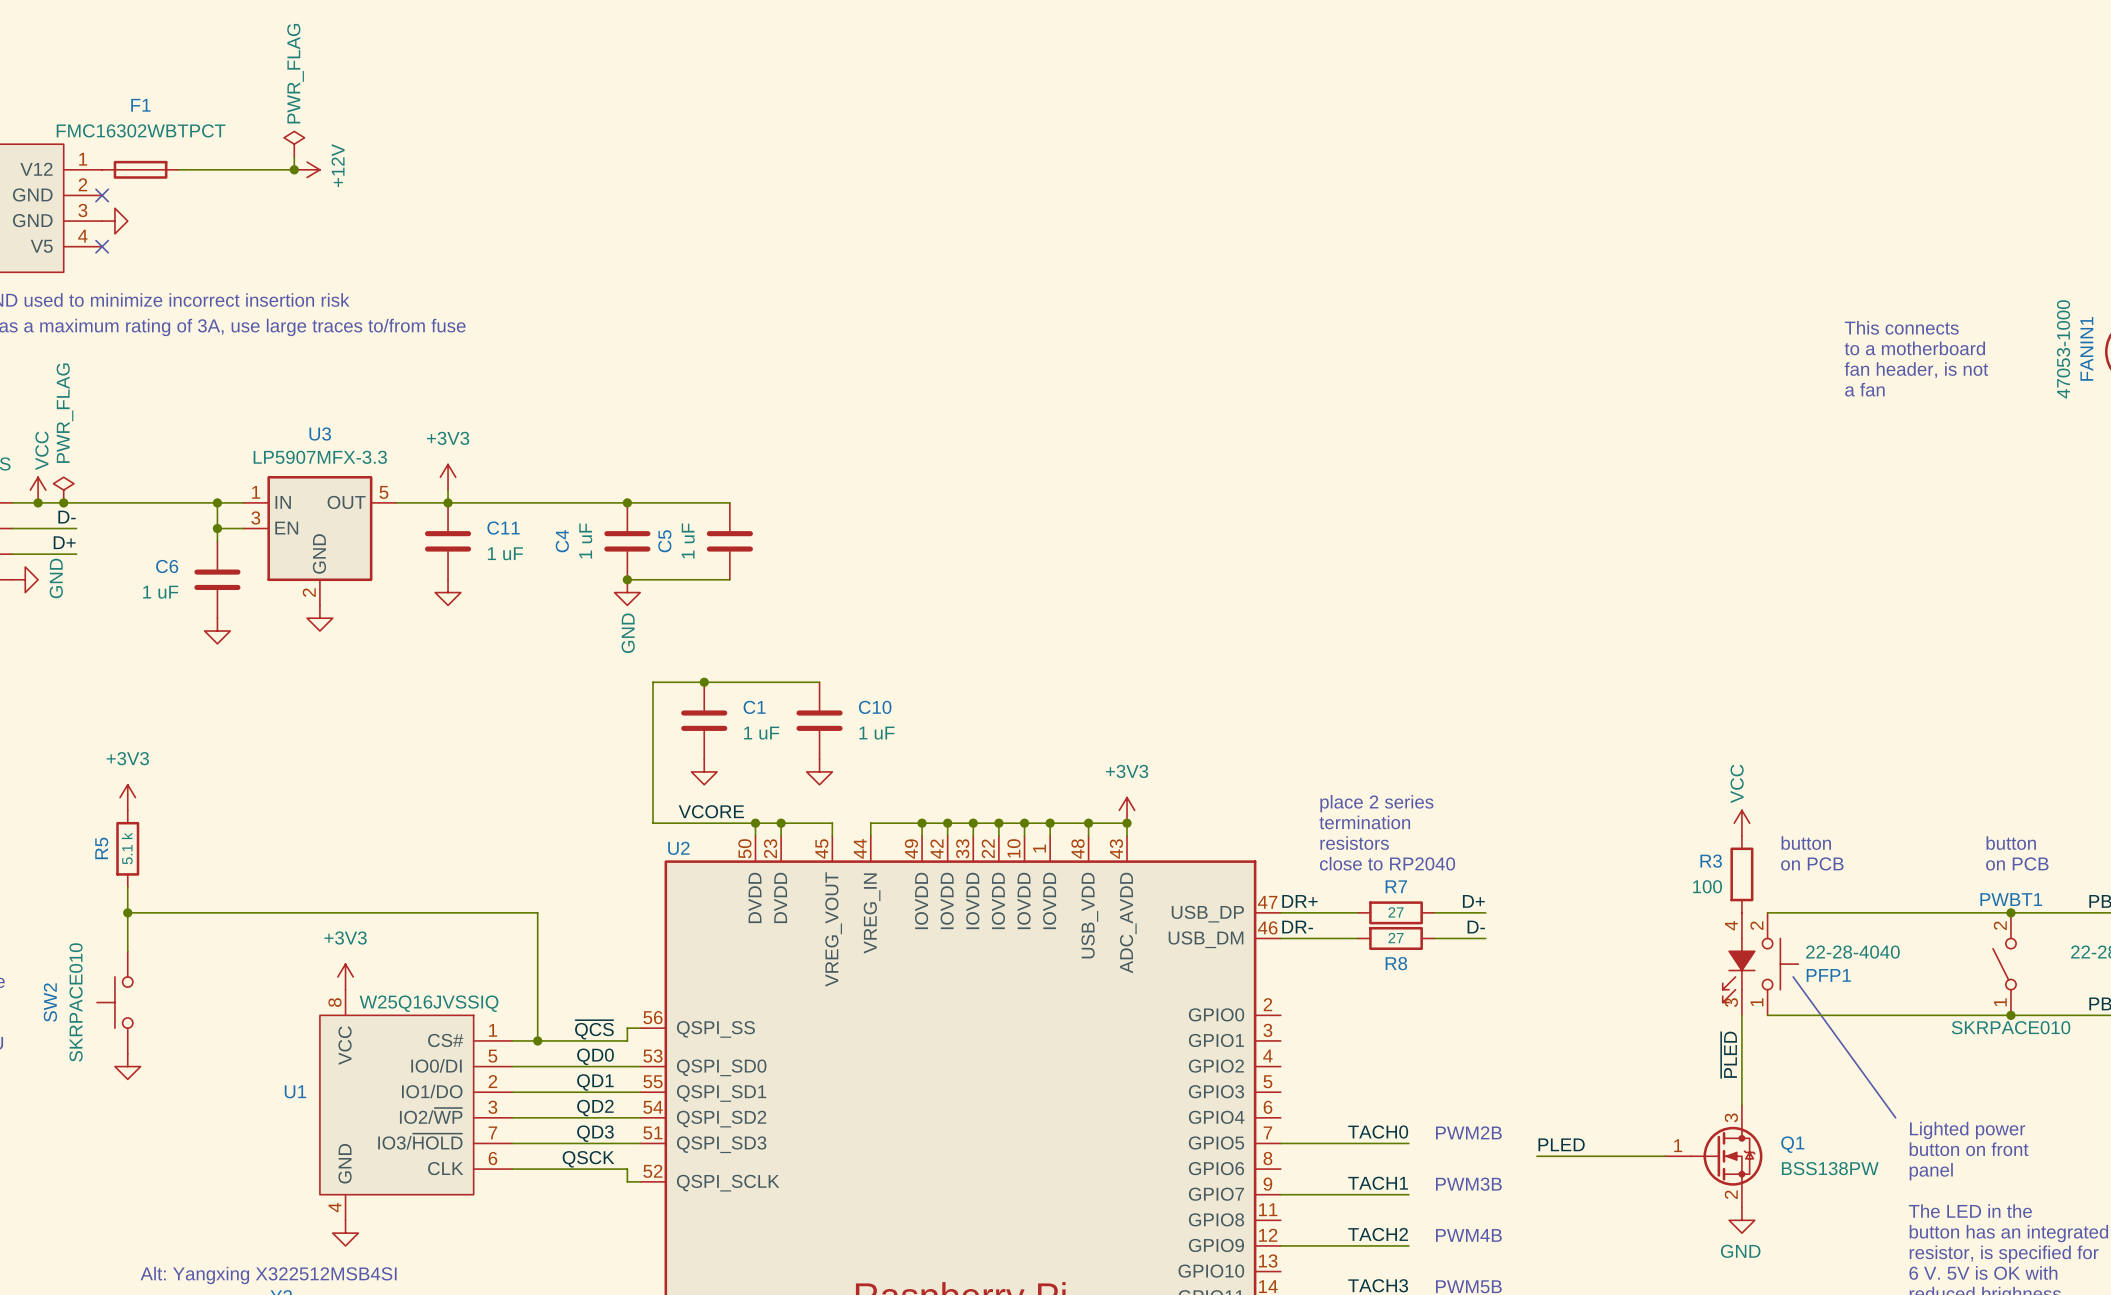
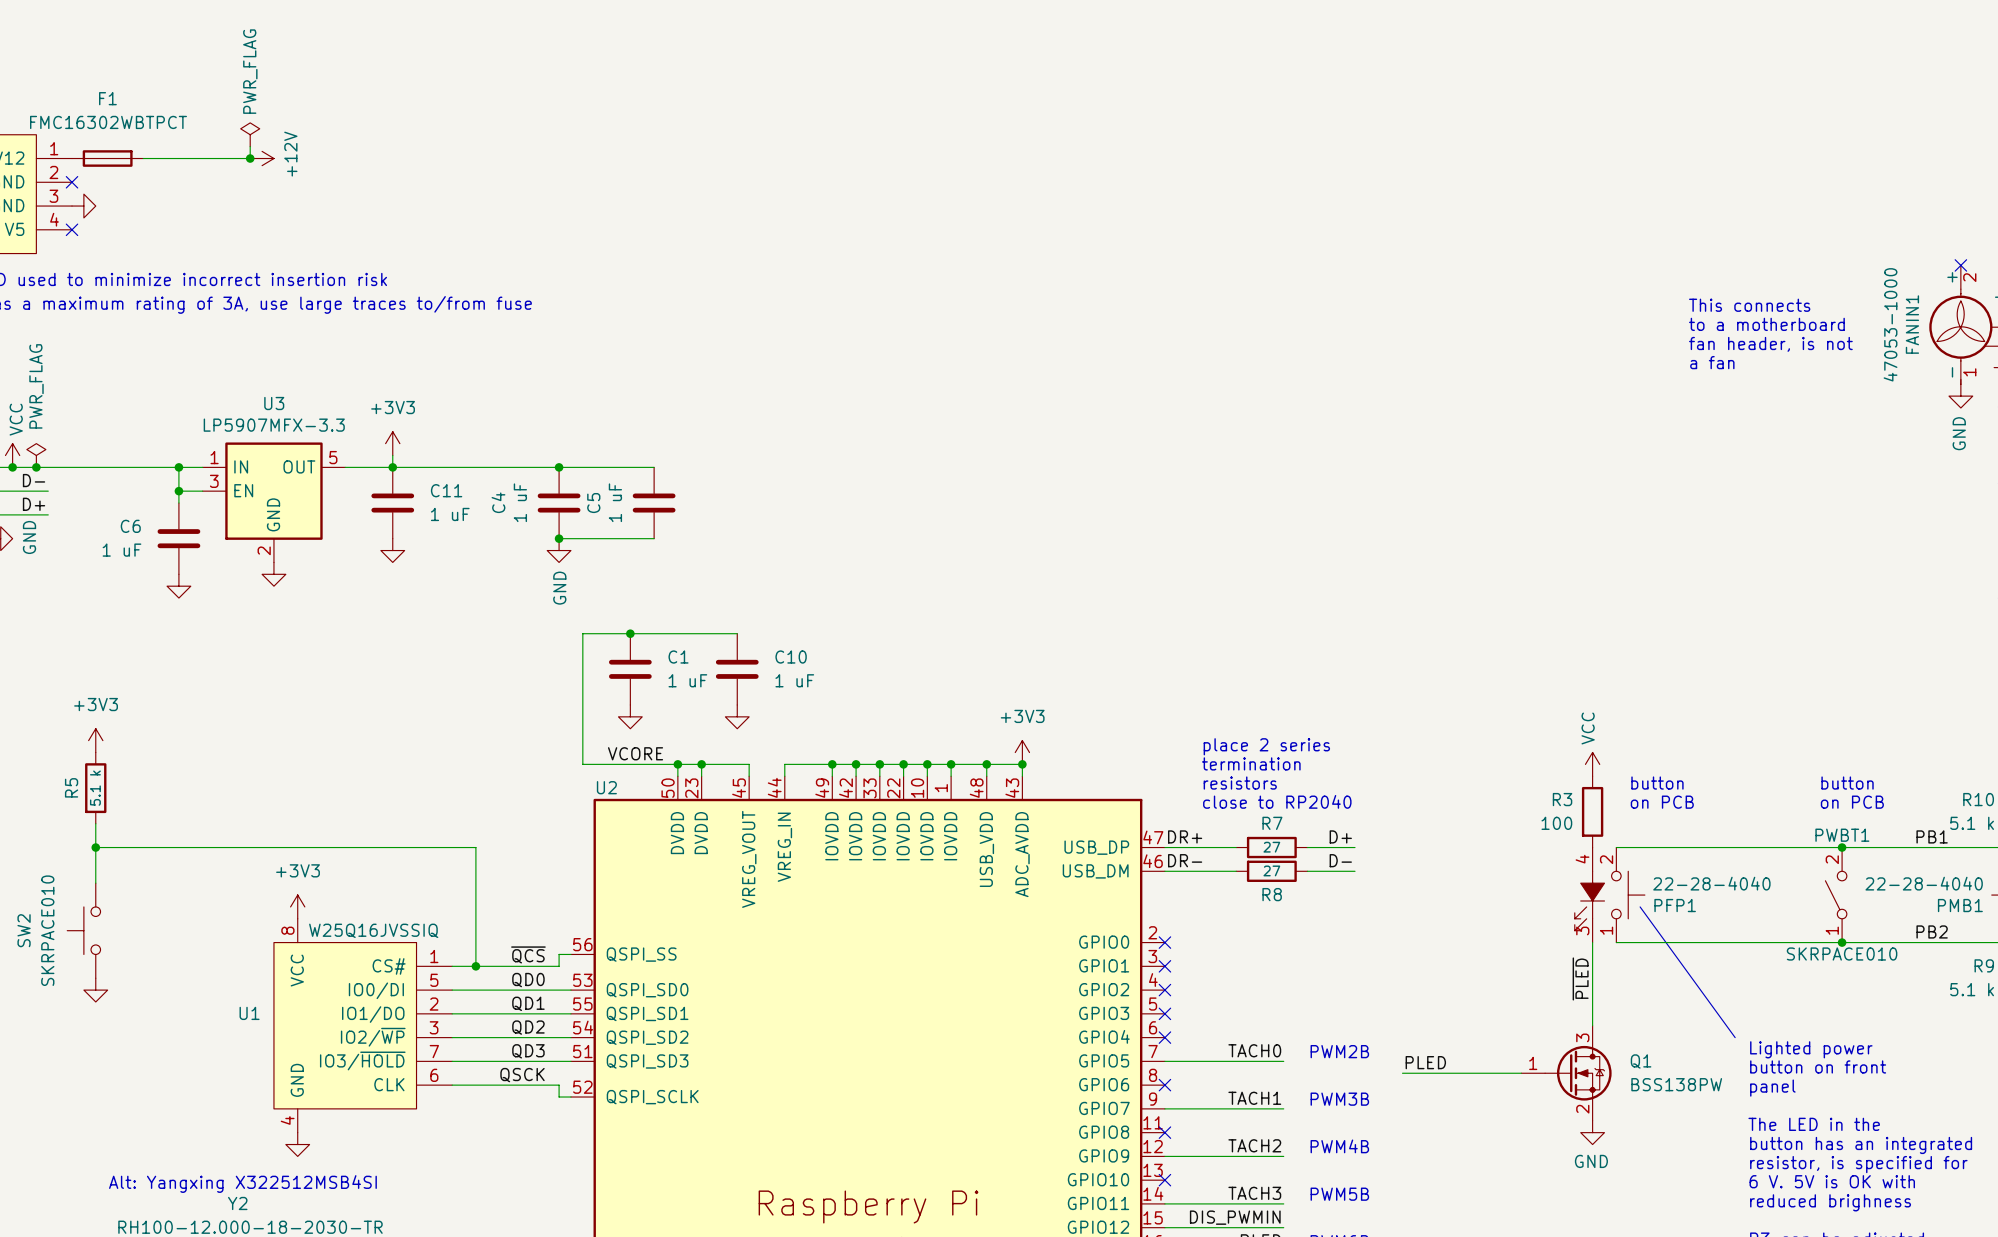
no-connect mark: none -> (1164, 942)
no-connect mark: none -> (1164, 966)
no-connect mark: none -> (1164, 990)
no-connect mark: none -> (1164, 1013)
no-connect mark: none -> (1164, 1037)
no-connect mark: none -> (1164, 1085)
no-connect mark: none -> (1164, 1132)
no-connect mark: none -> (1164, 1180)

